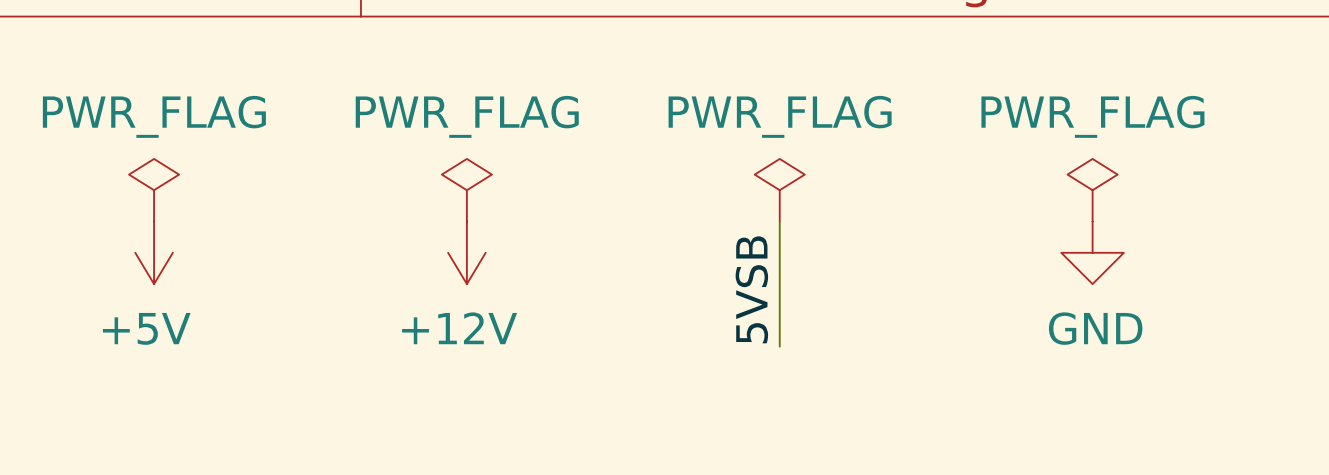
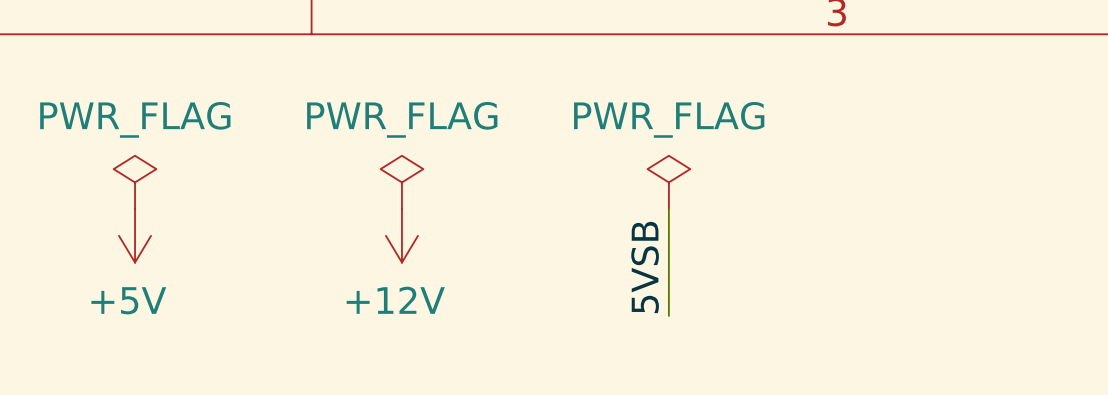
power symbol: PWR_FLAG (1092, 190) -> none
power symbol: GND (1092, 252) -> none

